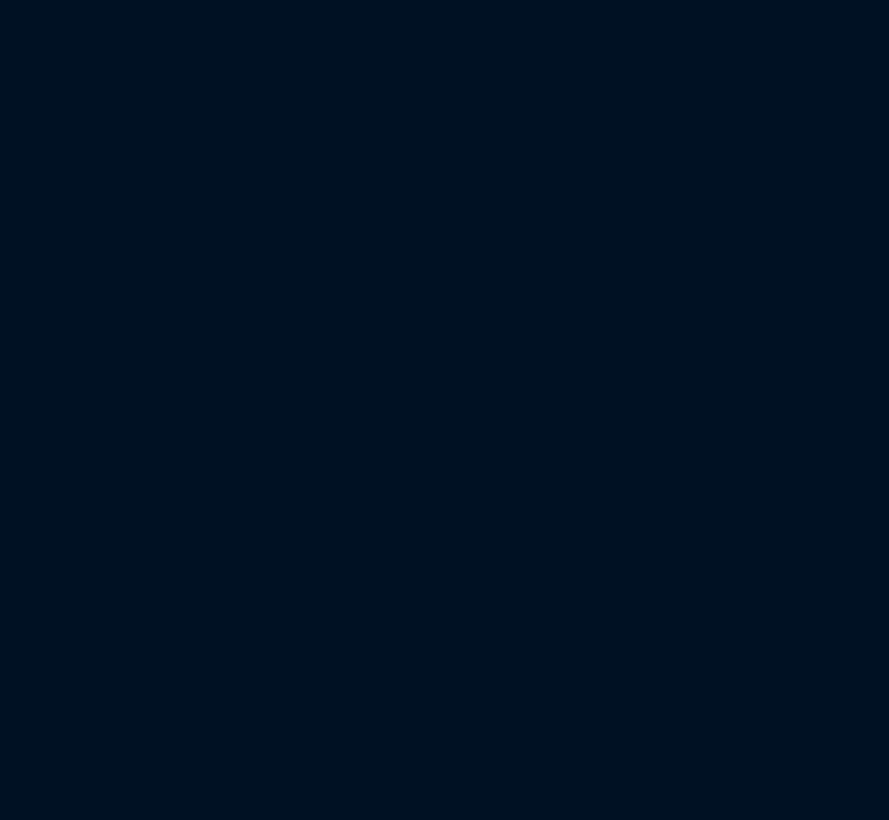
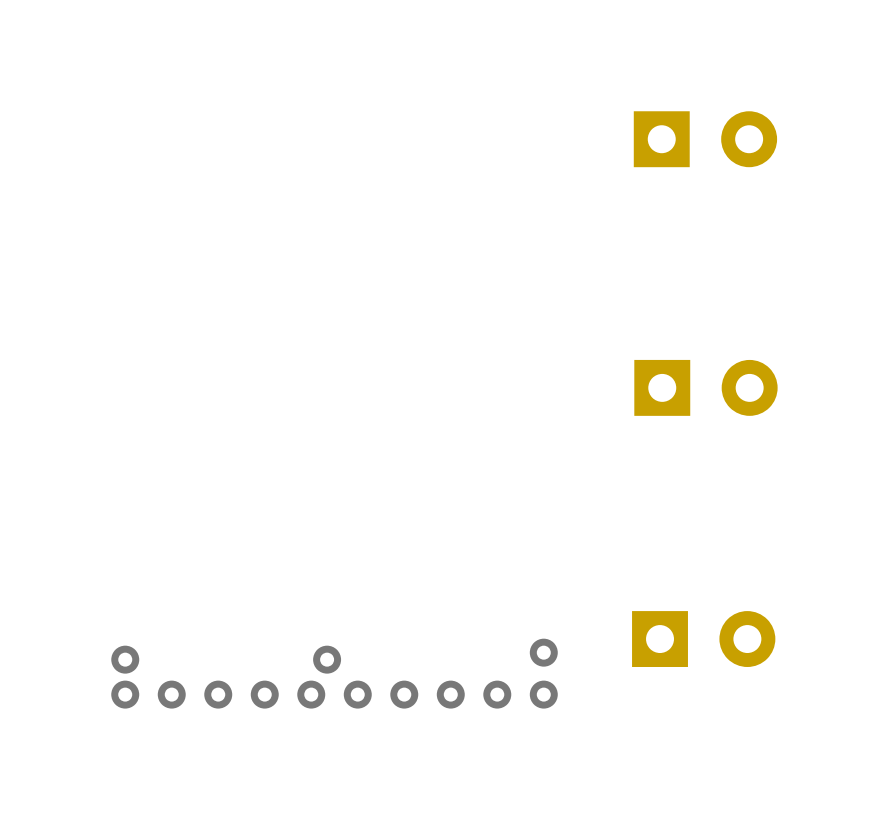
part: none -> (705, 139)
part: none -> (705, 387)
part: none -> (703, 639)
via: none -> (543, 652)
via: none -> (125, 659)
via: none -> (327, 659)
via: none -> (125, 694)
via: none -> (171, 694)
via: none -> (218, 694)
via: none -> (264, 694)
via: none -> (311, 694)
via: none -> (357, 694)
via: none -> (404, 694)
via: none -> (450, 694)
via: none -> (497, 694)
via: none -> (543, 694)

